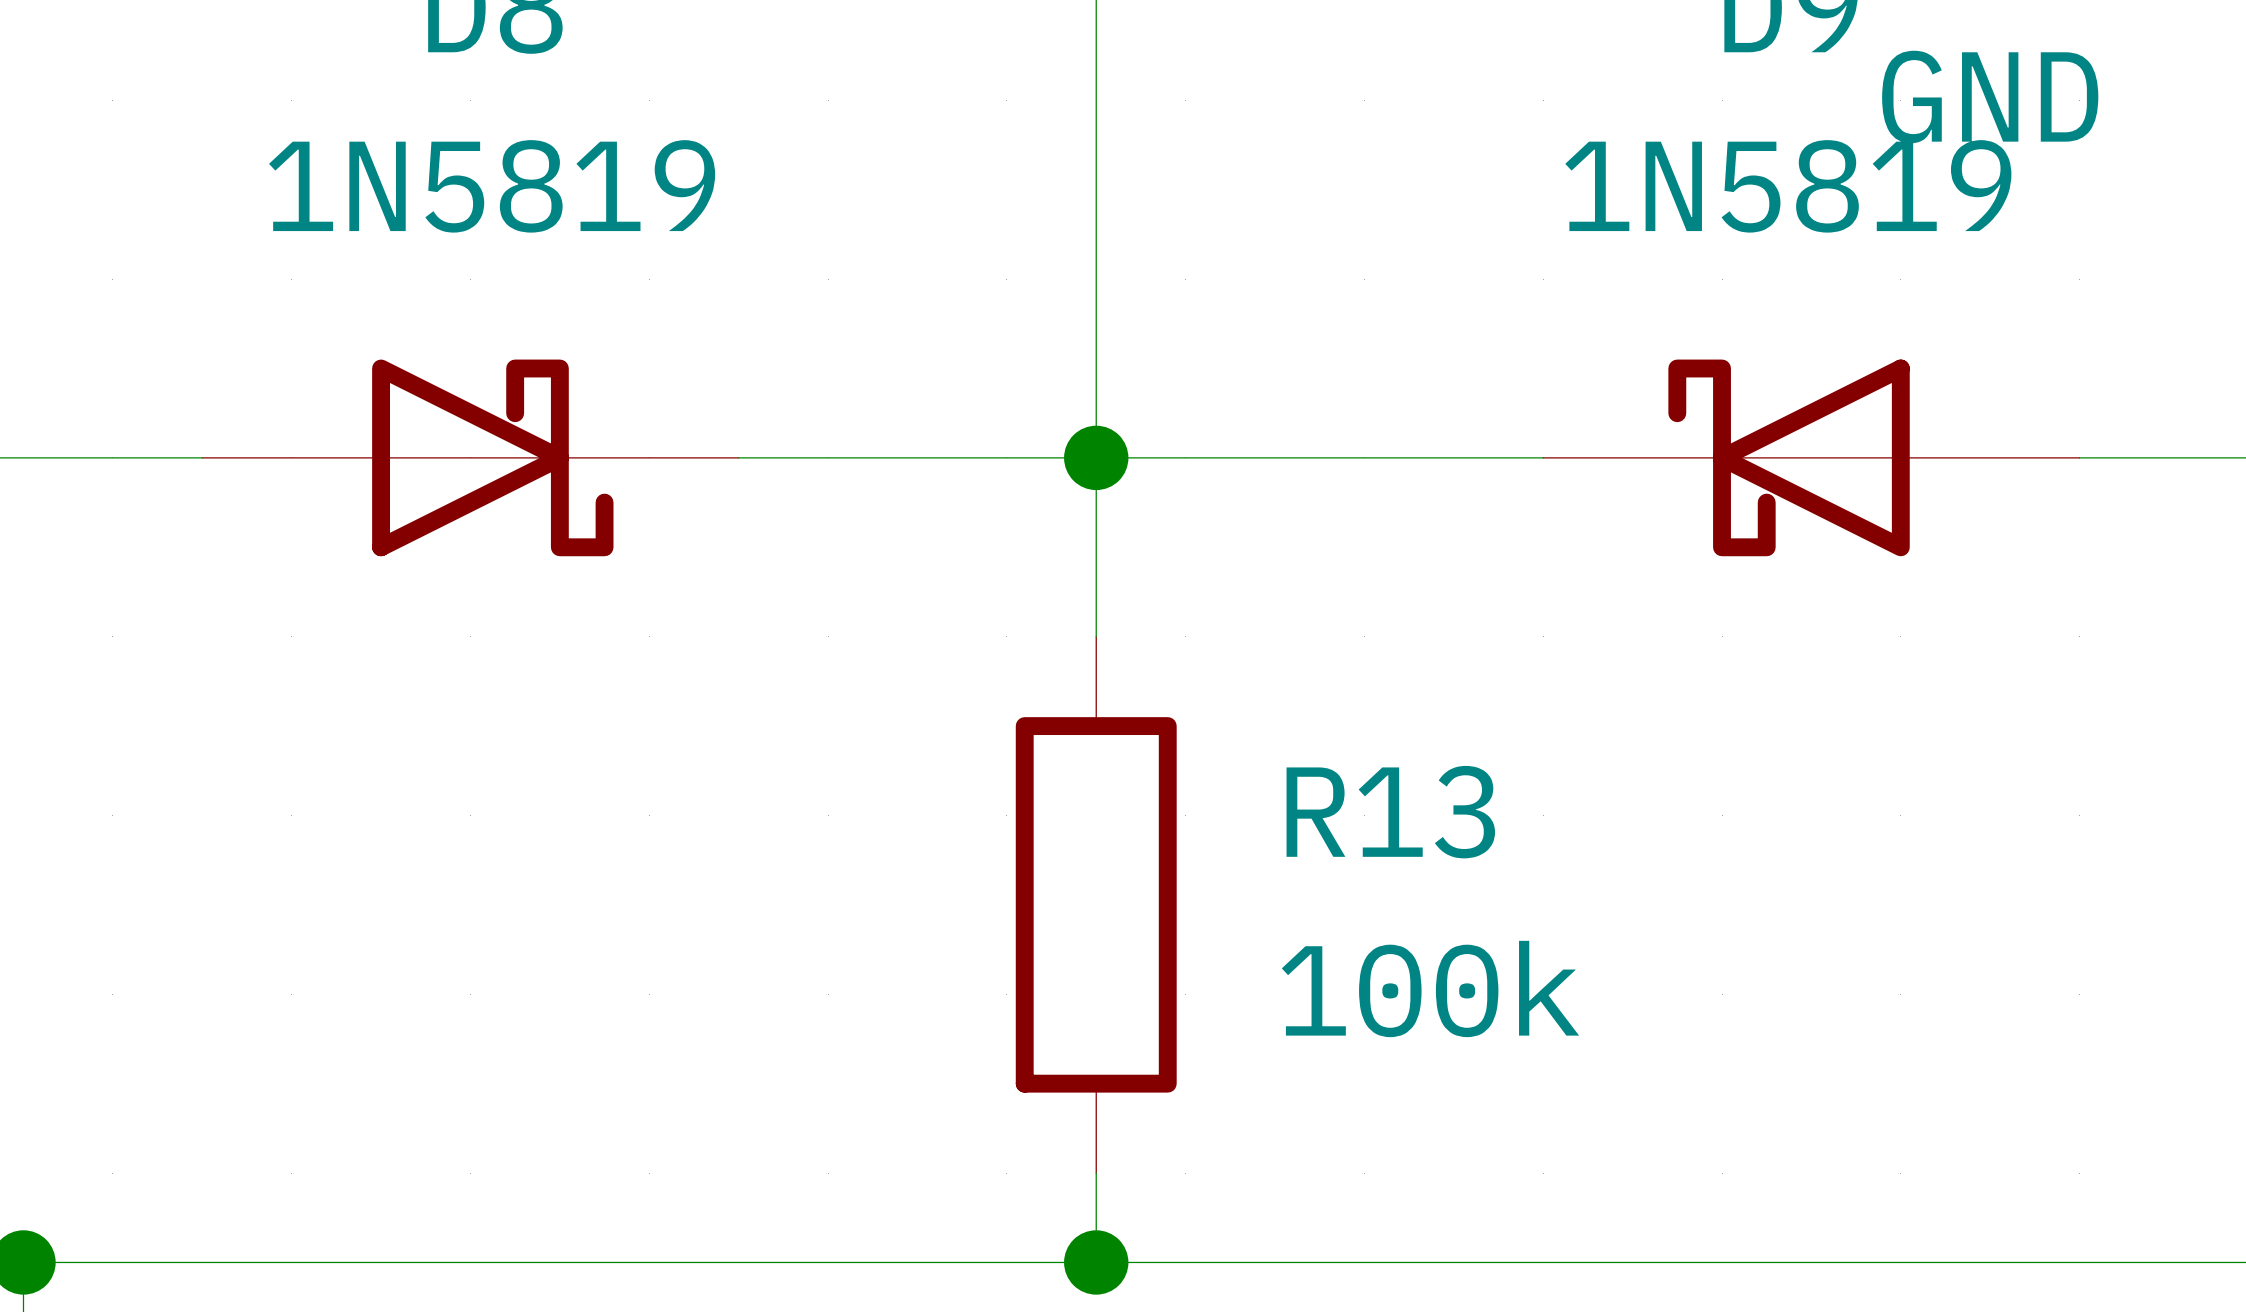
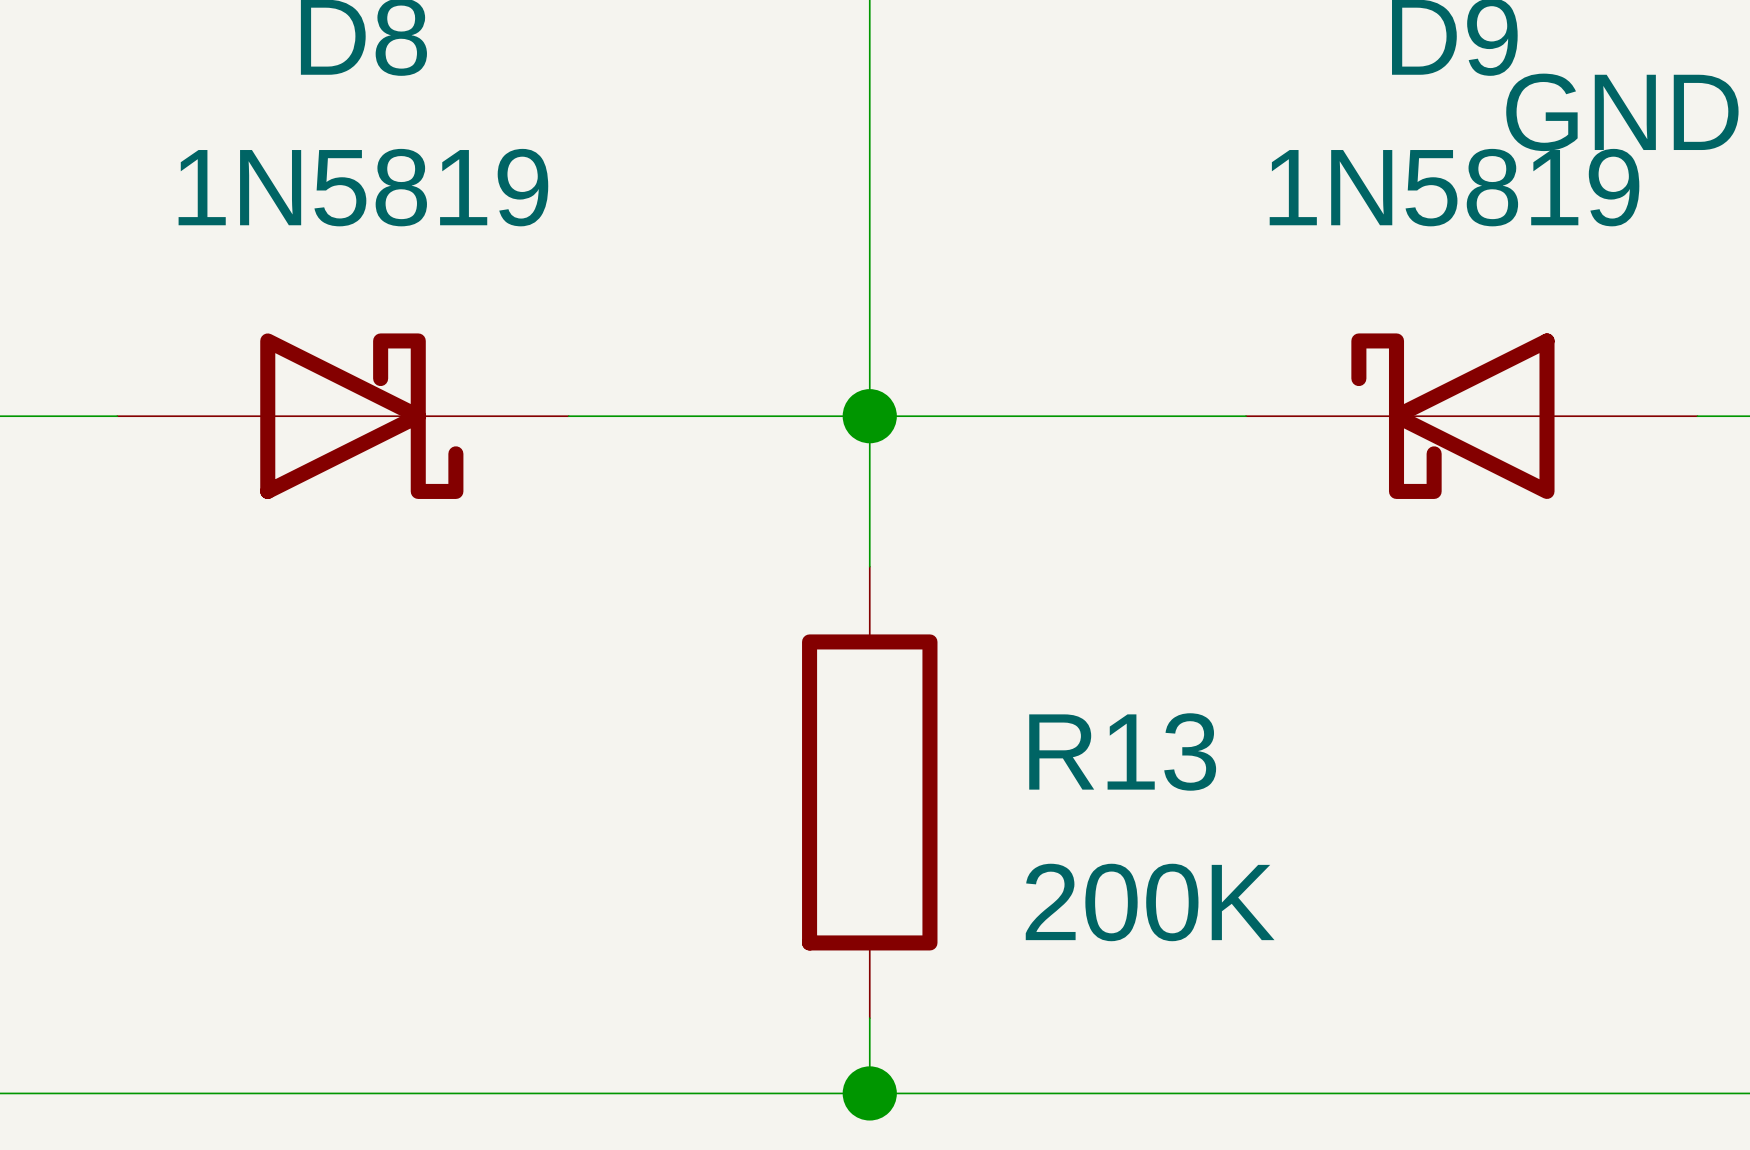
R13 name position: R13 (1390, 812) -> R13 (1122, 751)
R13 value: 100k (1430, 989) -> 200K (1150, 902)

